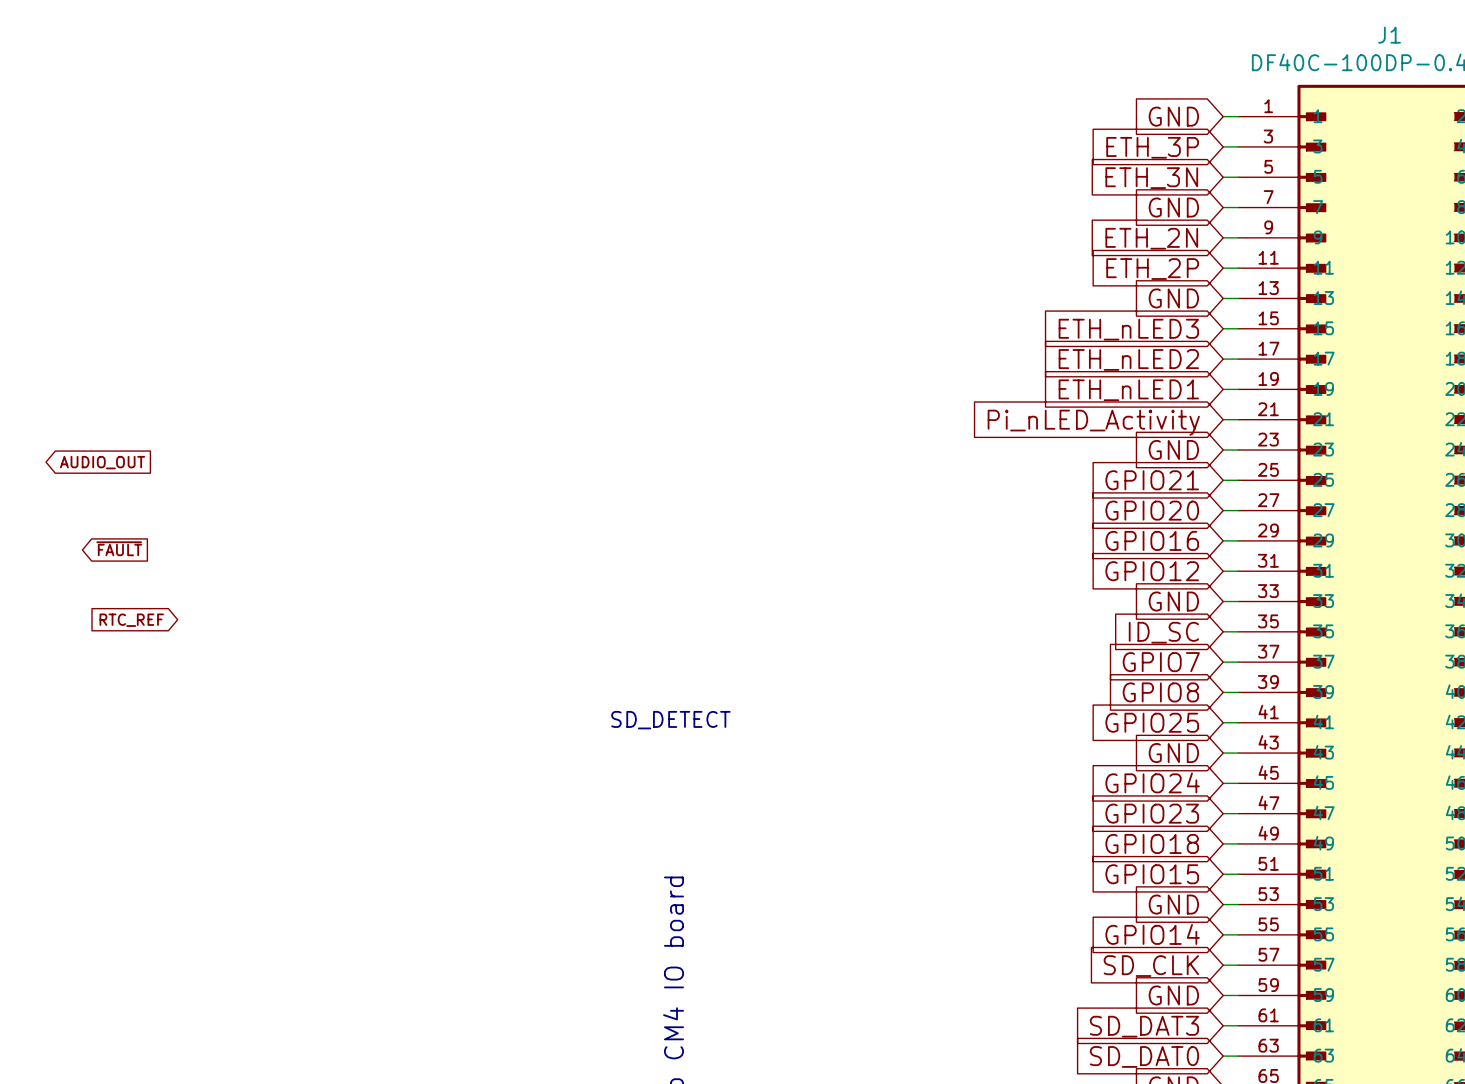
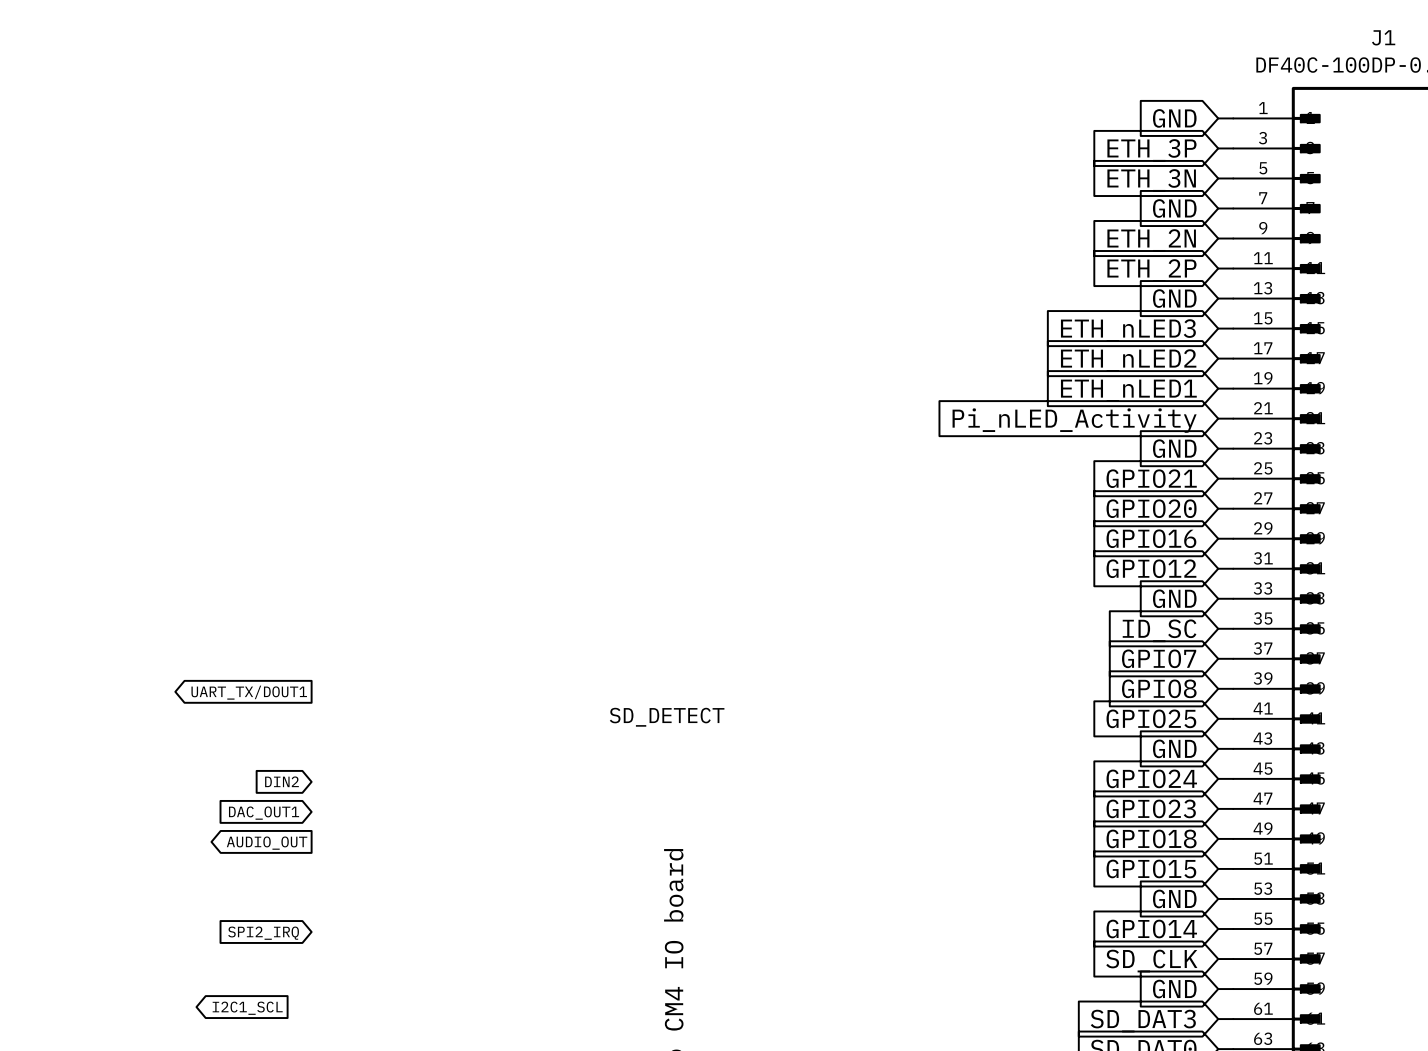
global label: AUDIO_OUT (102, 462) -> none
global label: ~{FAULT} (119, 548) -> none
global label: RTC_REF (131, 620) -> none
global label: none -> UART_TX/DOUT1 (249, 692)
global label: none -> DIN2 (281, 781)
global label: none -> DAC_OUT1 (264, 813)
global label: none -> AUDIO_OUT (267, 843)
global label: none -> SPI2_IRQ (263, 933)
global label: none -> I2C1_SCL (247, 1008)

